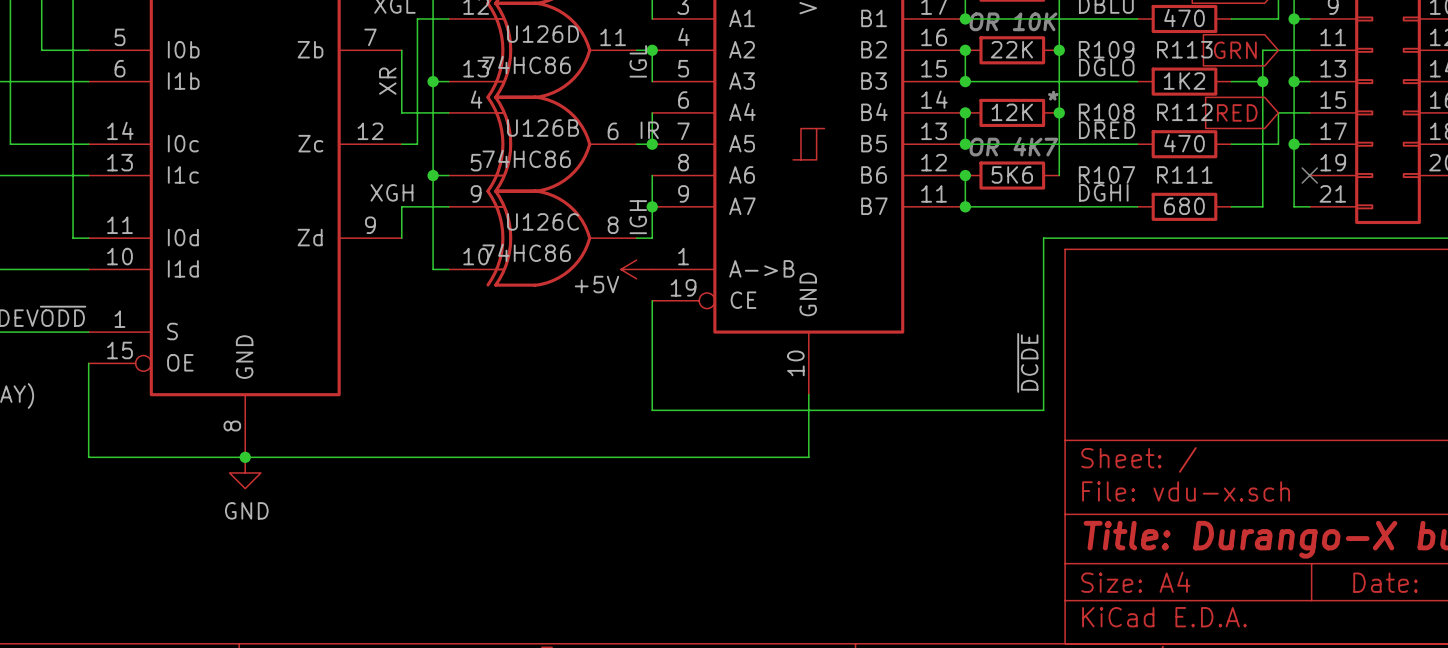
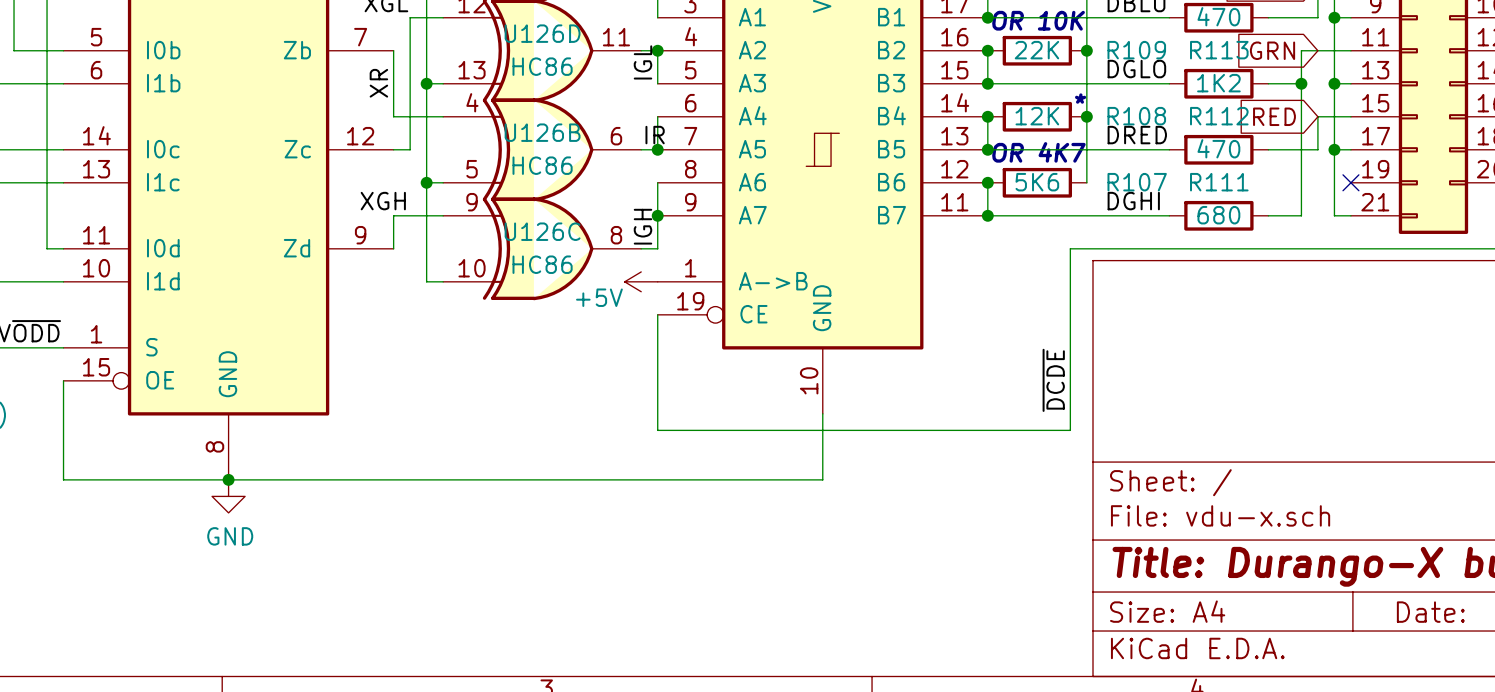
U126D value: 74HC86 (526, 64) -> HC86 (542, 66)
U126B value: 74HC86 (526, 158) -> HC86 (542, 165)
U126C value: 74HC86 (526, 252) -> HC86 (542, 264)

